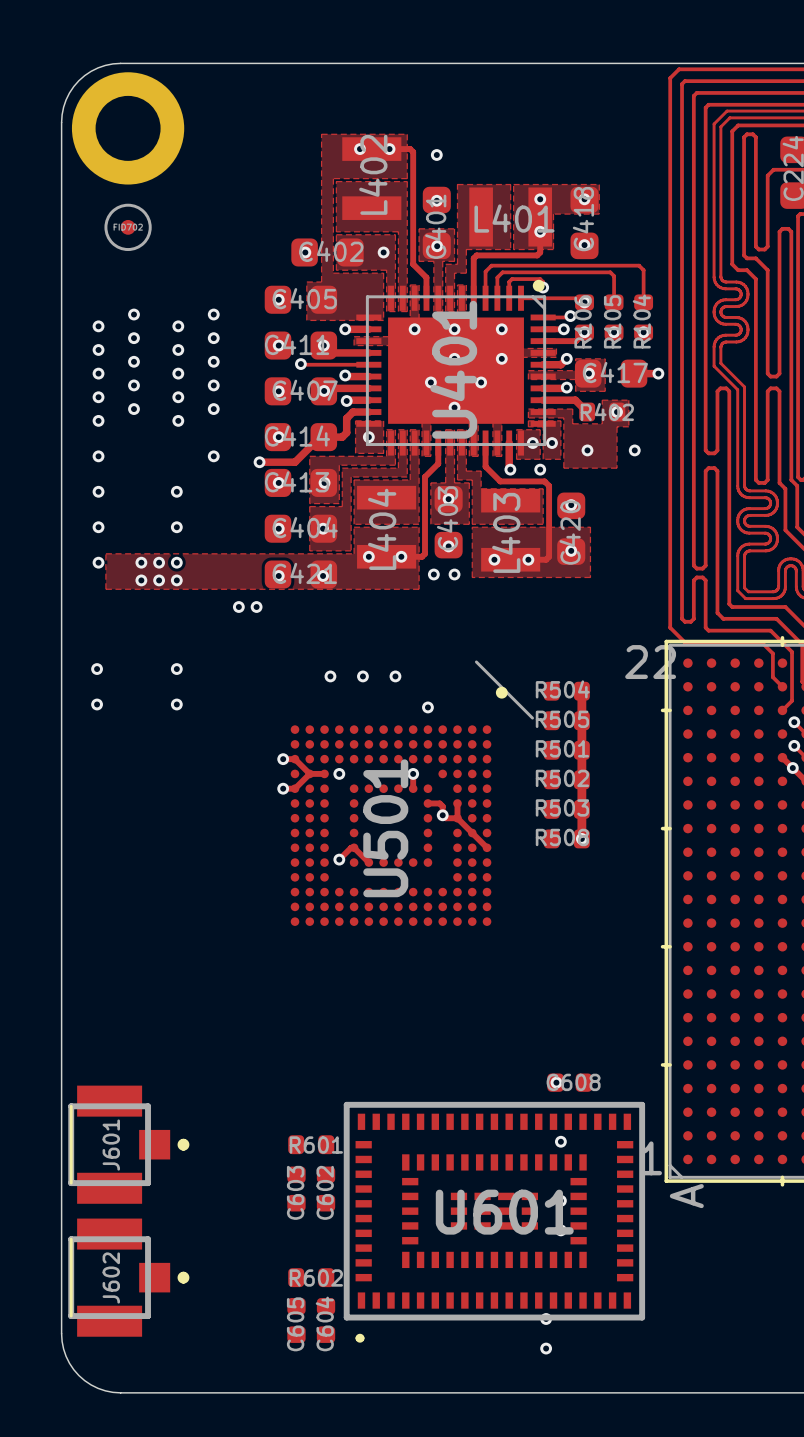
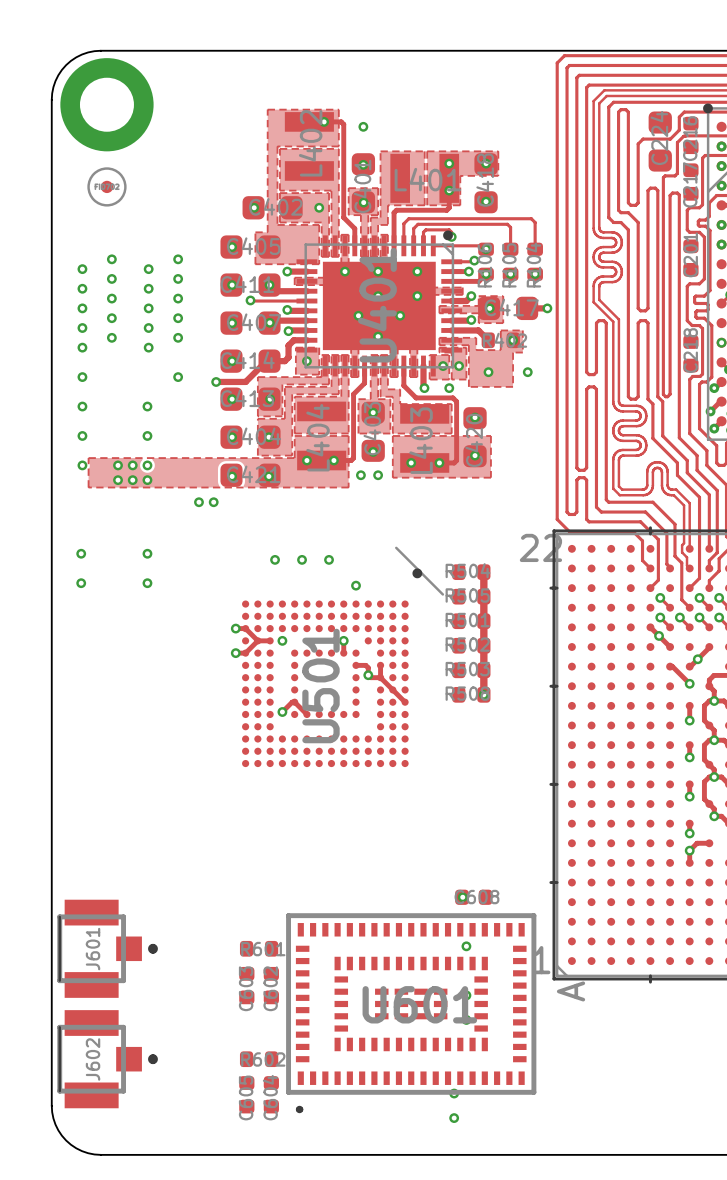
via: (359, 149) -> none

